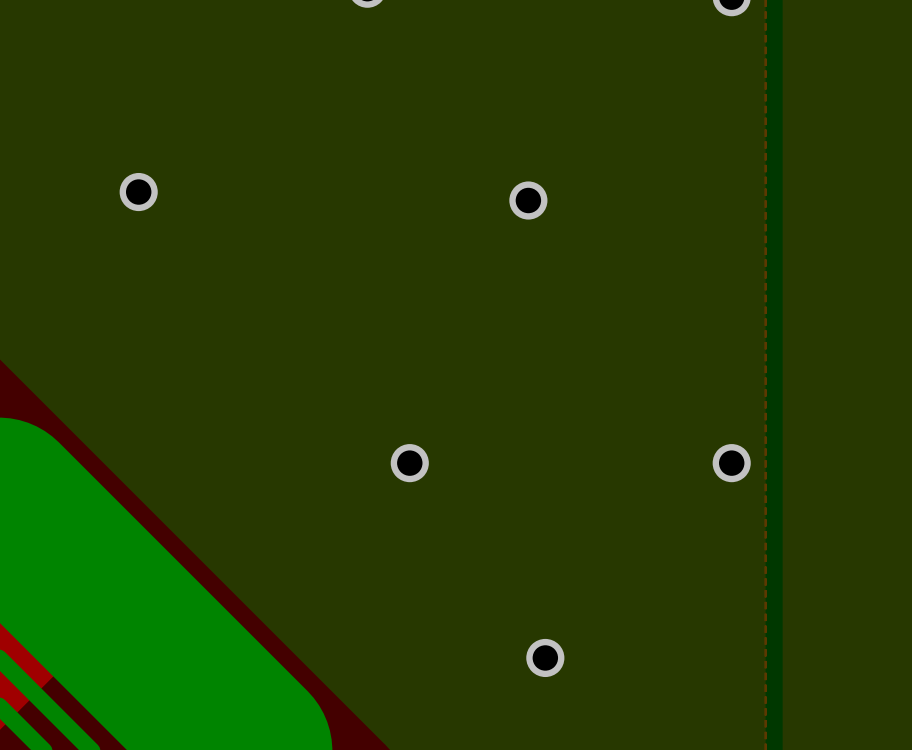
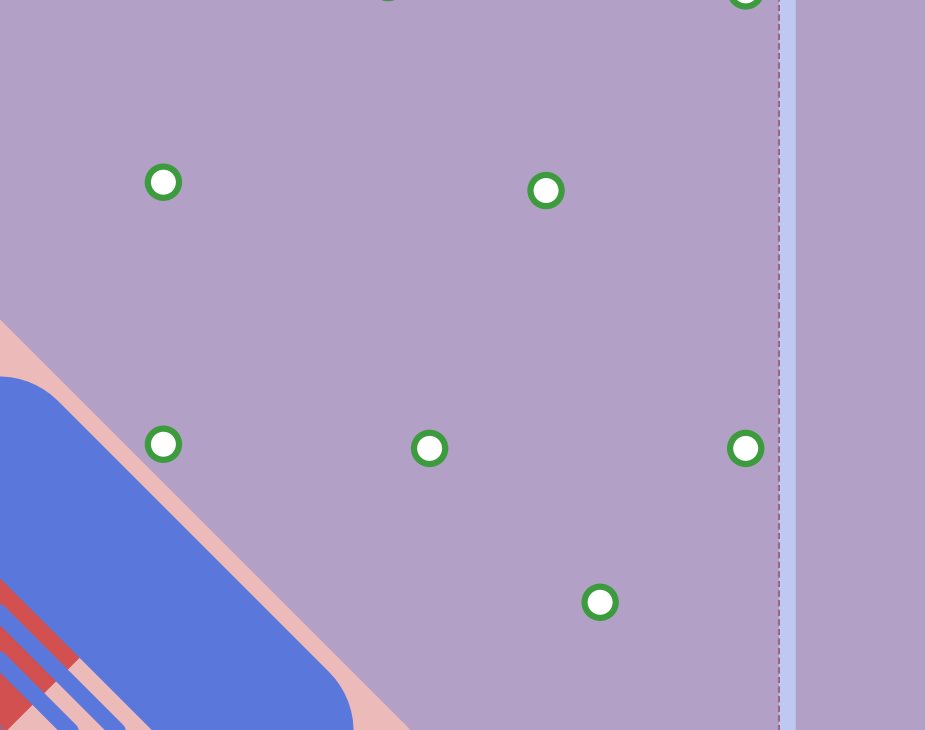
via: none -> (163, 444)
via position: (545, 657) -> (600, 602)

